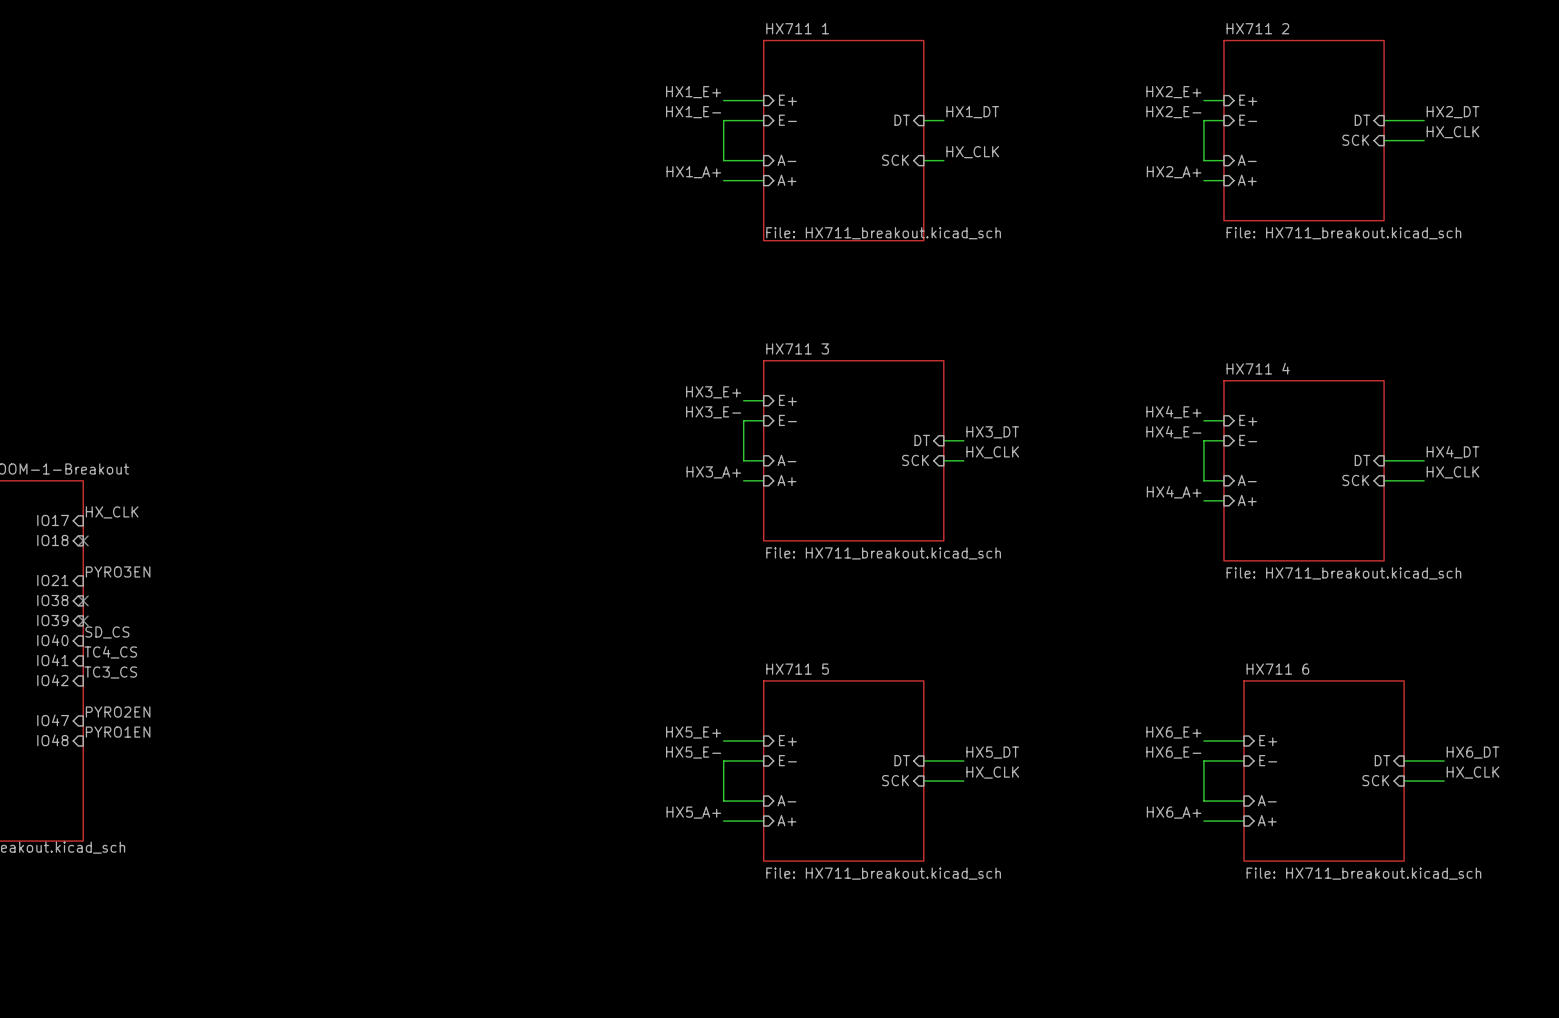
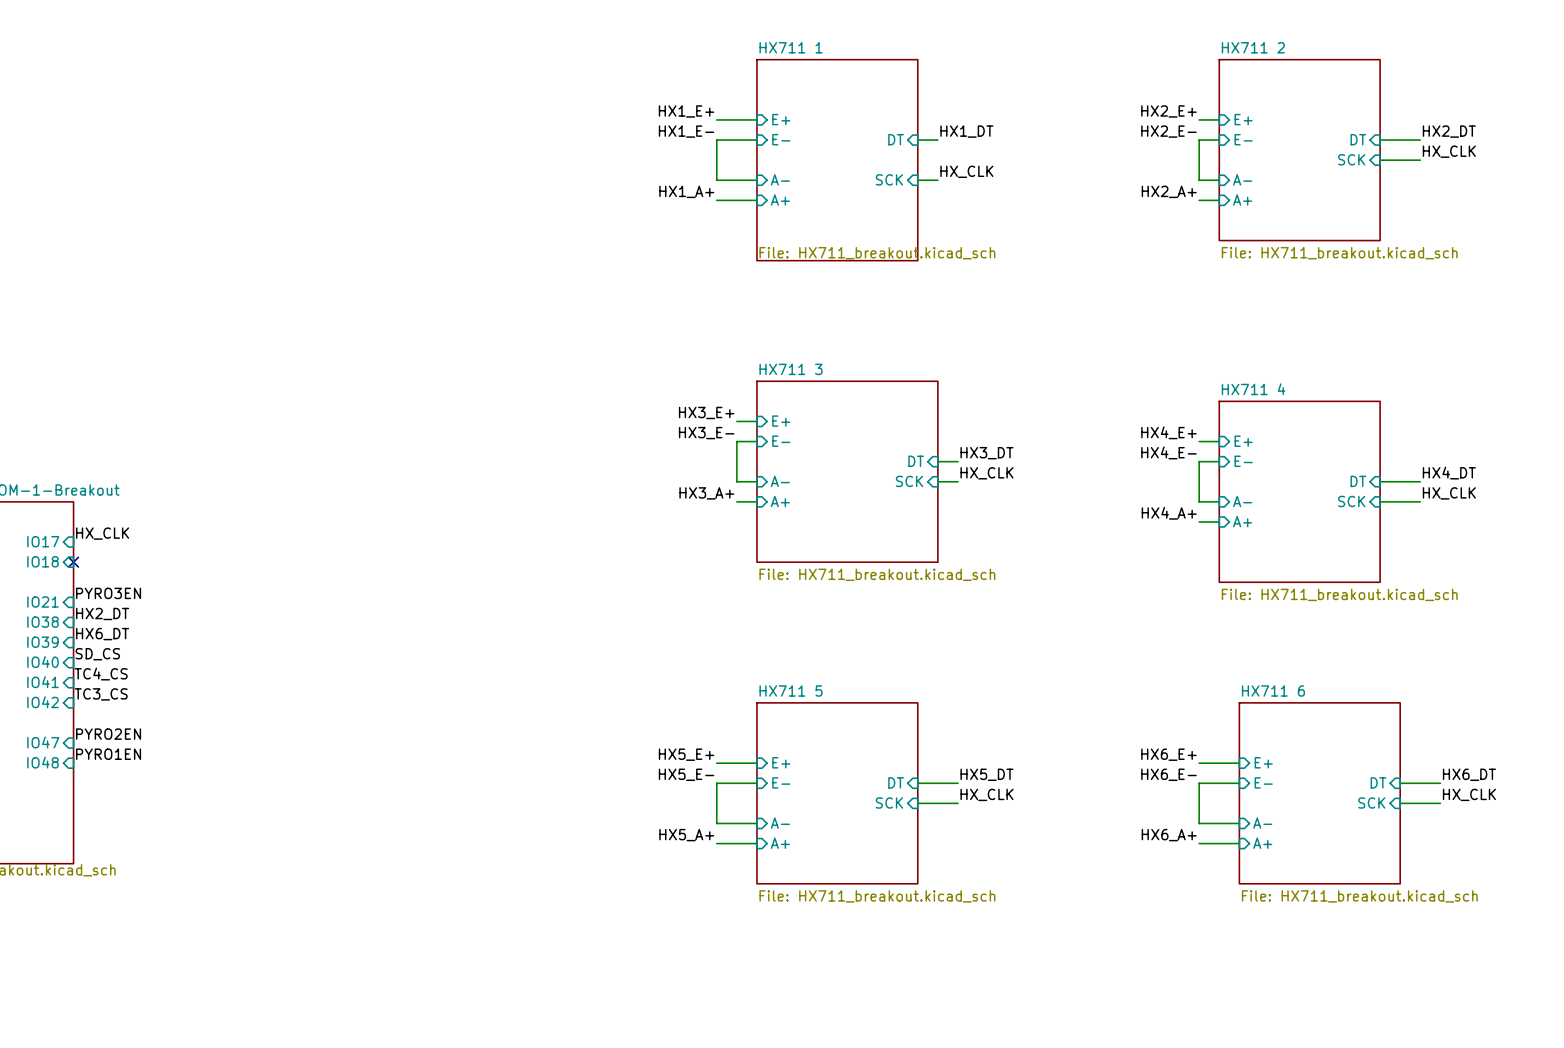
label: none -> HX2_DT (102, 613)
no-connect mark: (83, 600) -> none
label: none -> HX6_DT (102, 634)
no-connect mark: (83, 620) -> none

